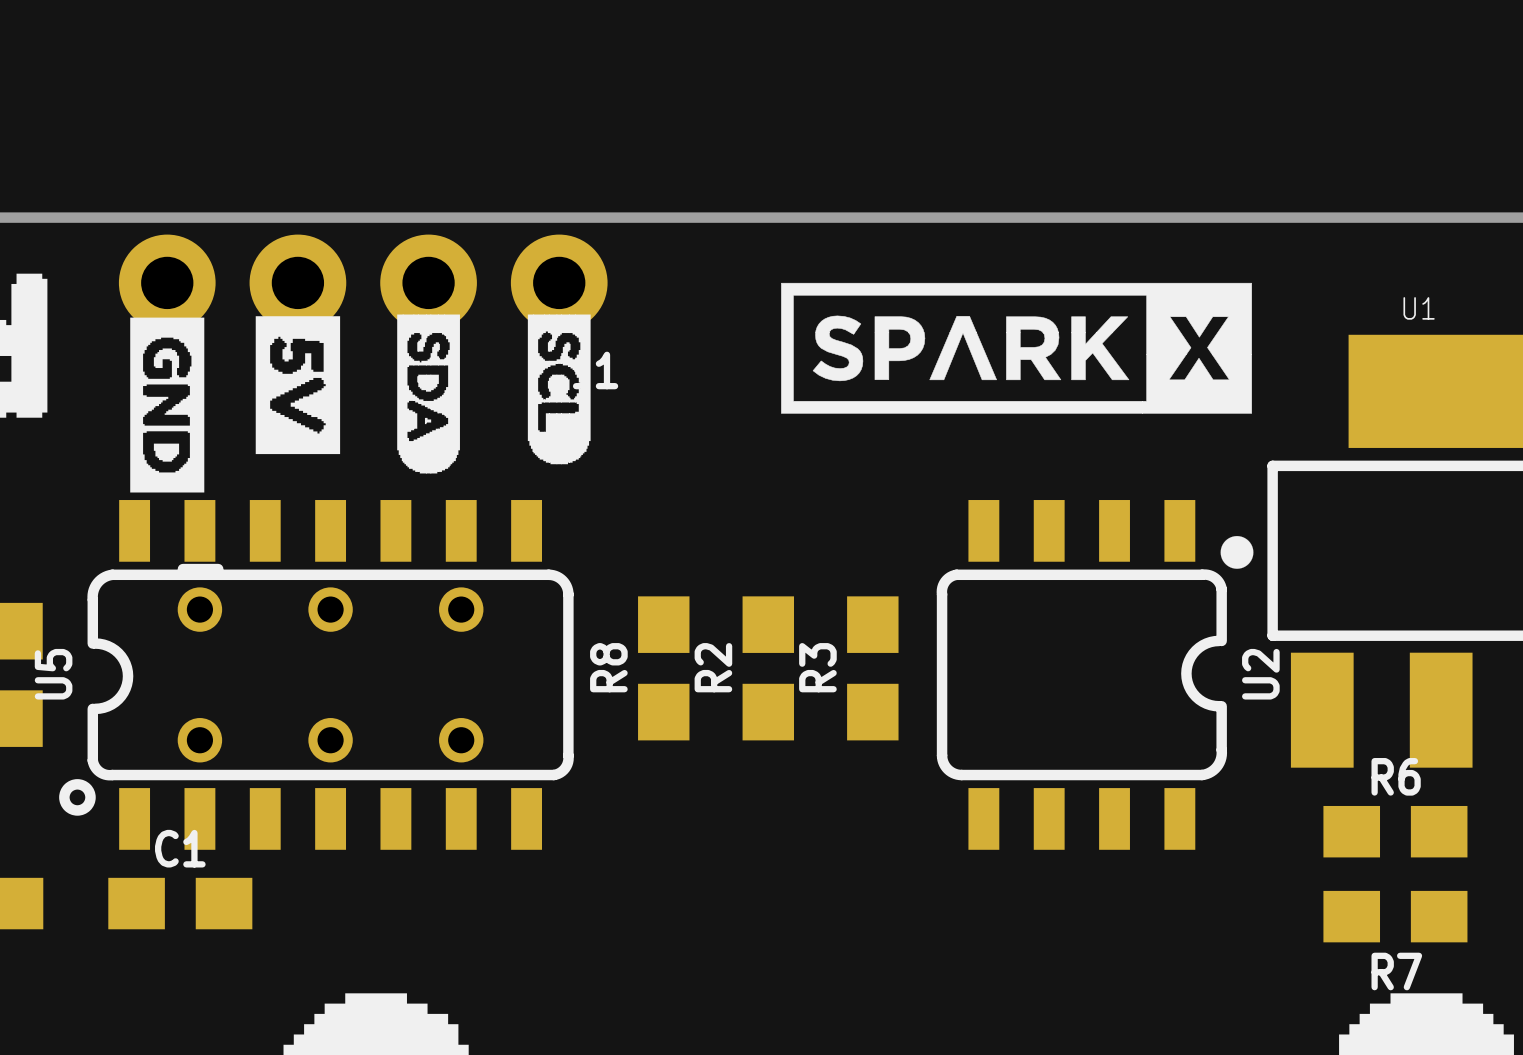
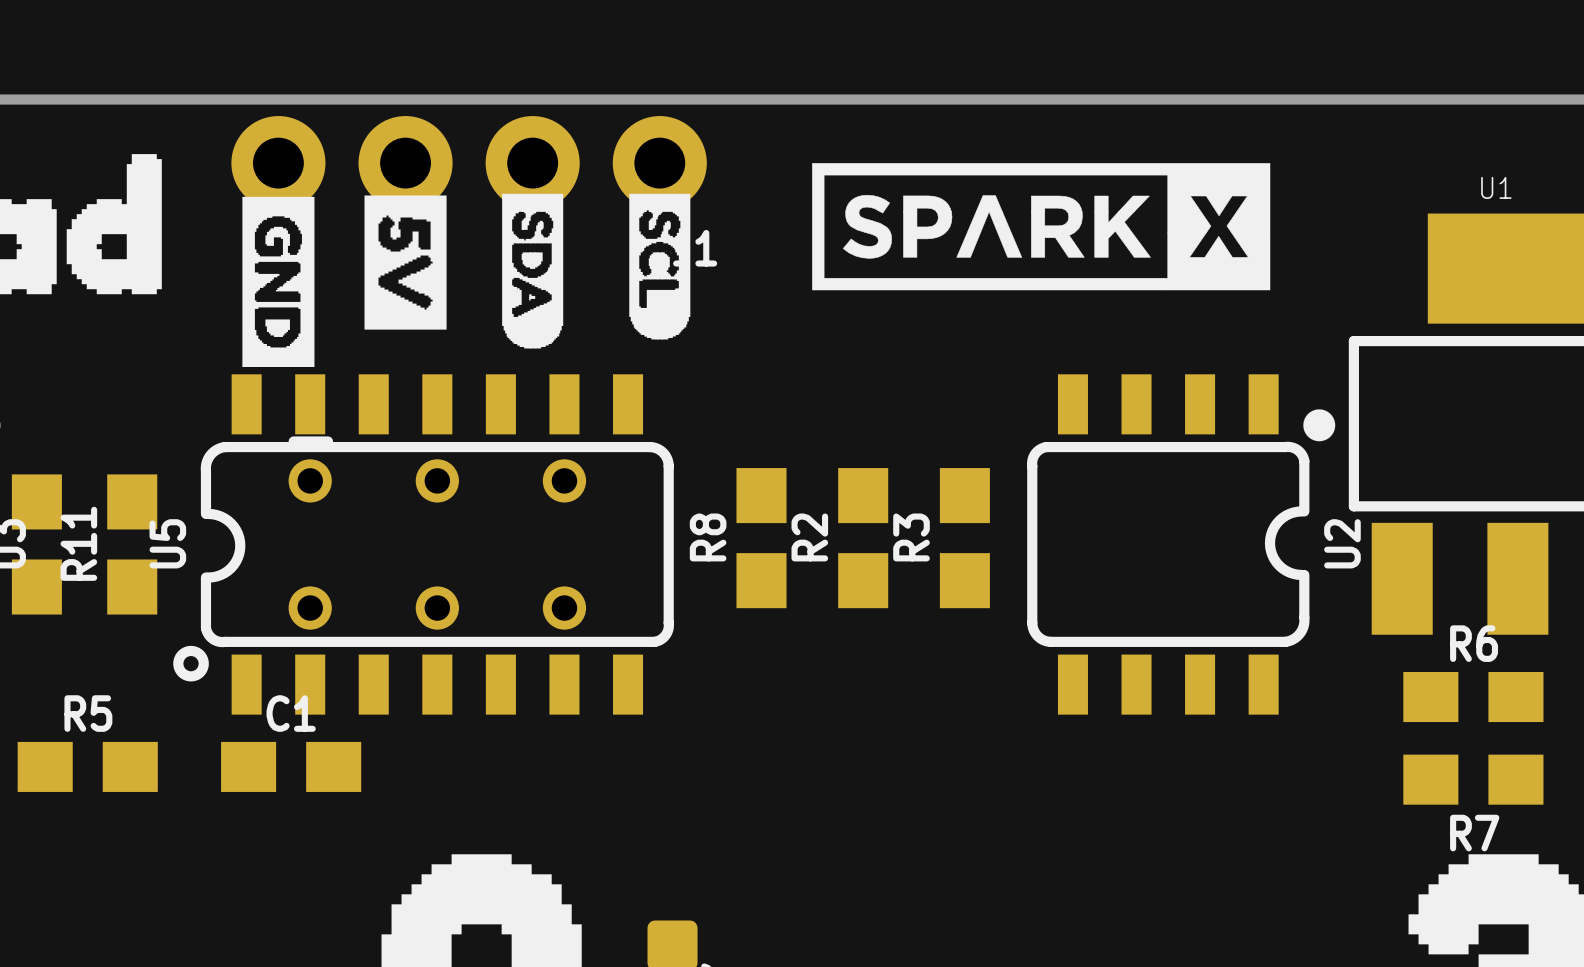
drawing position: (1016, 348) -> (1041, 226)

